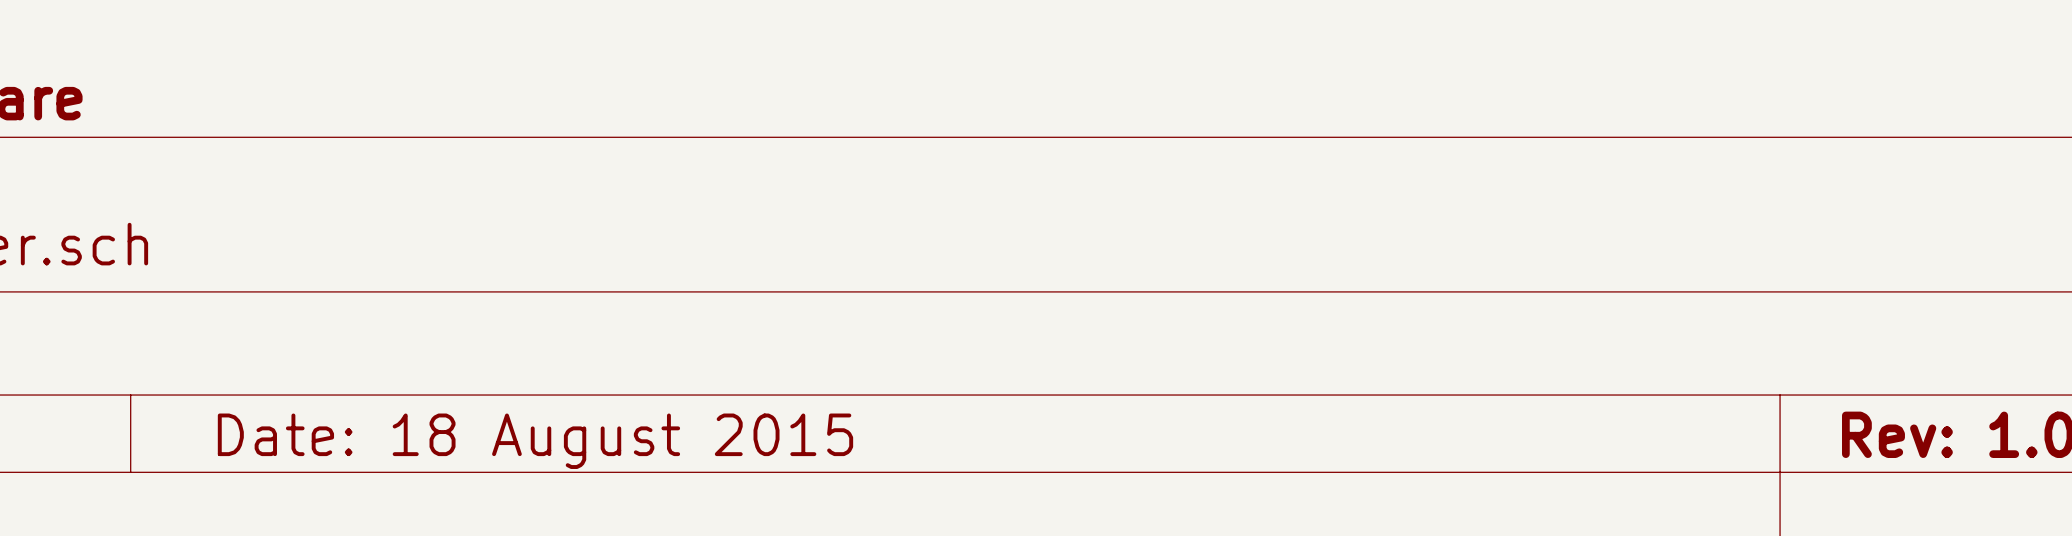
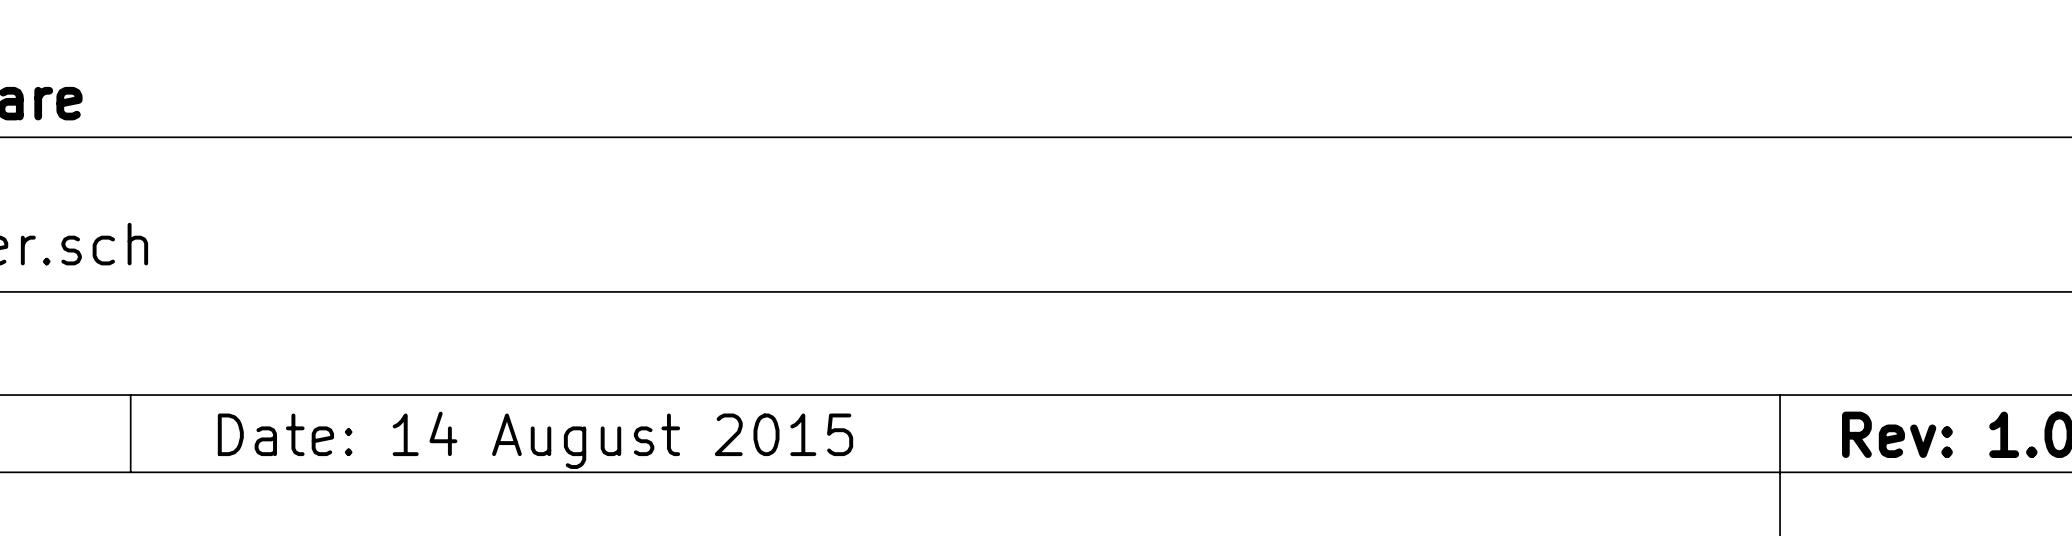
title block: Date: 18 August 2015 (535, 441) -> Date: 14 August 2015 (535, 440)

